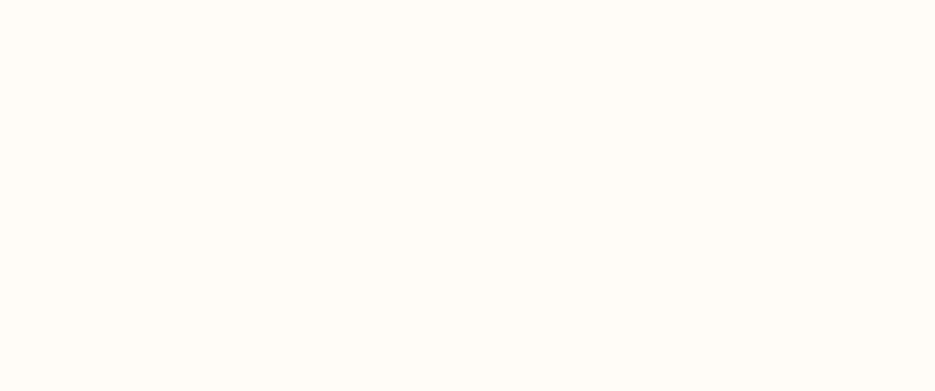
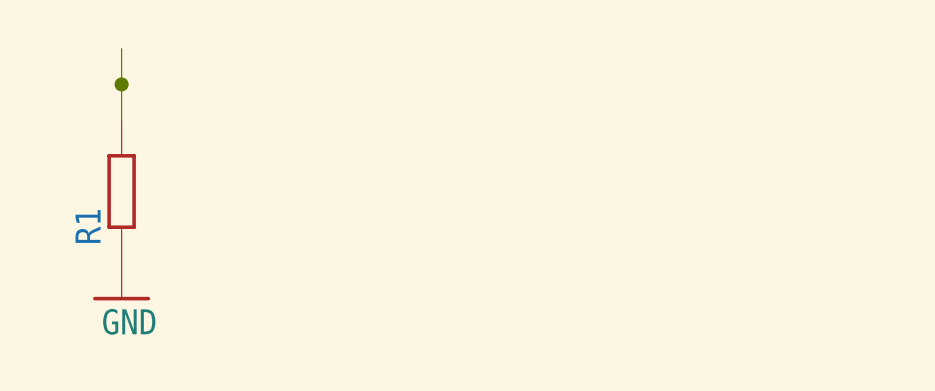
wire: none -> (121, 48) (121, 120)
junction: none -> (121, 84)
R1: none -> (121, 191)
power symbol: none -> GND (121, 281)

